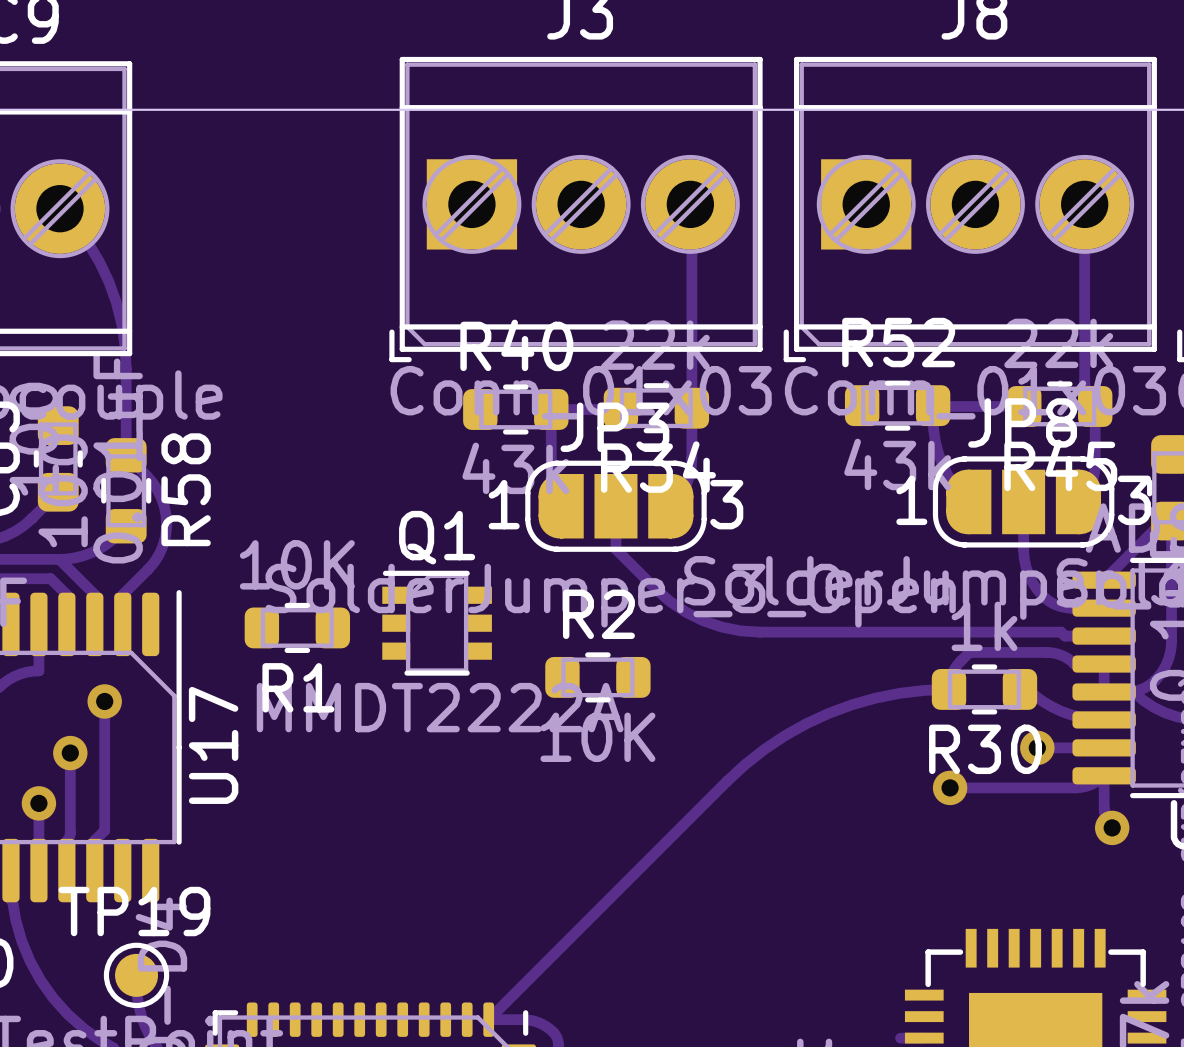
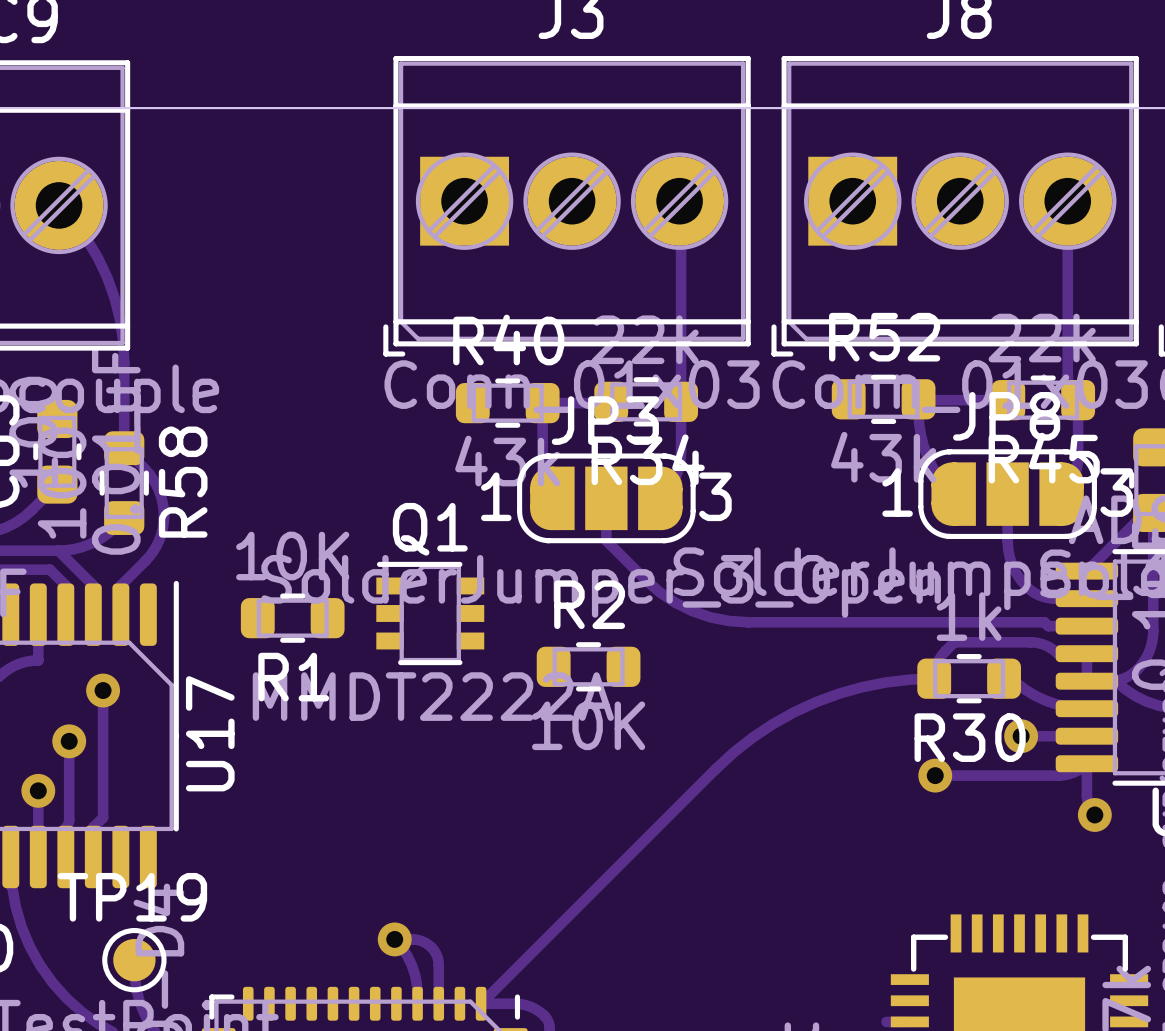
via: none -> (394, 939)
track: none -> (417, 1003) (416, 984) (411, 964) (394, 939) (420, 940) (433, 949) (438, 961) (438, 1003)

